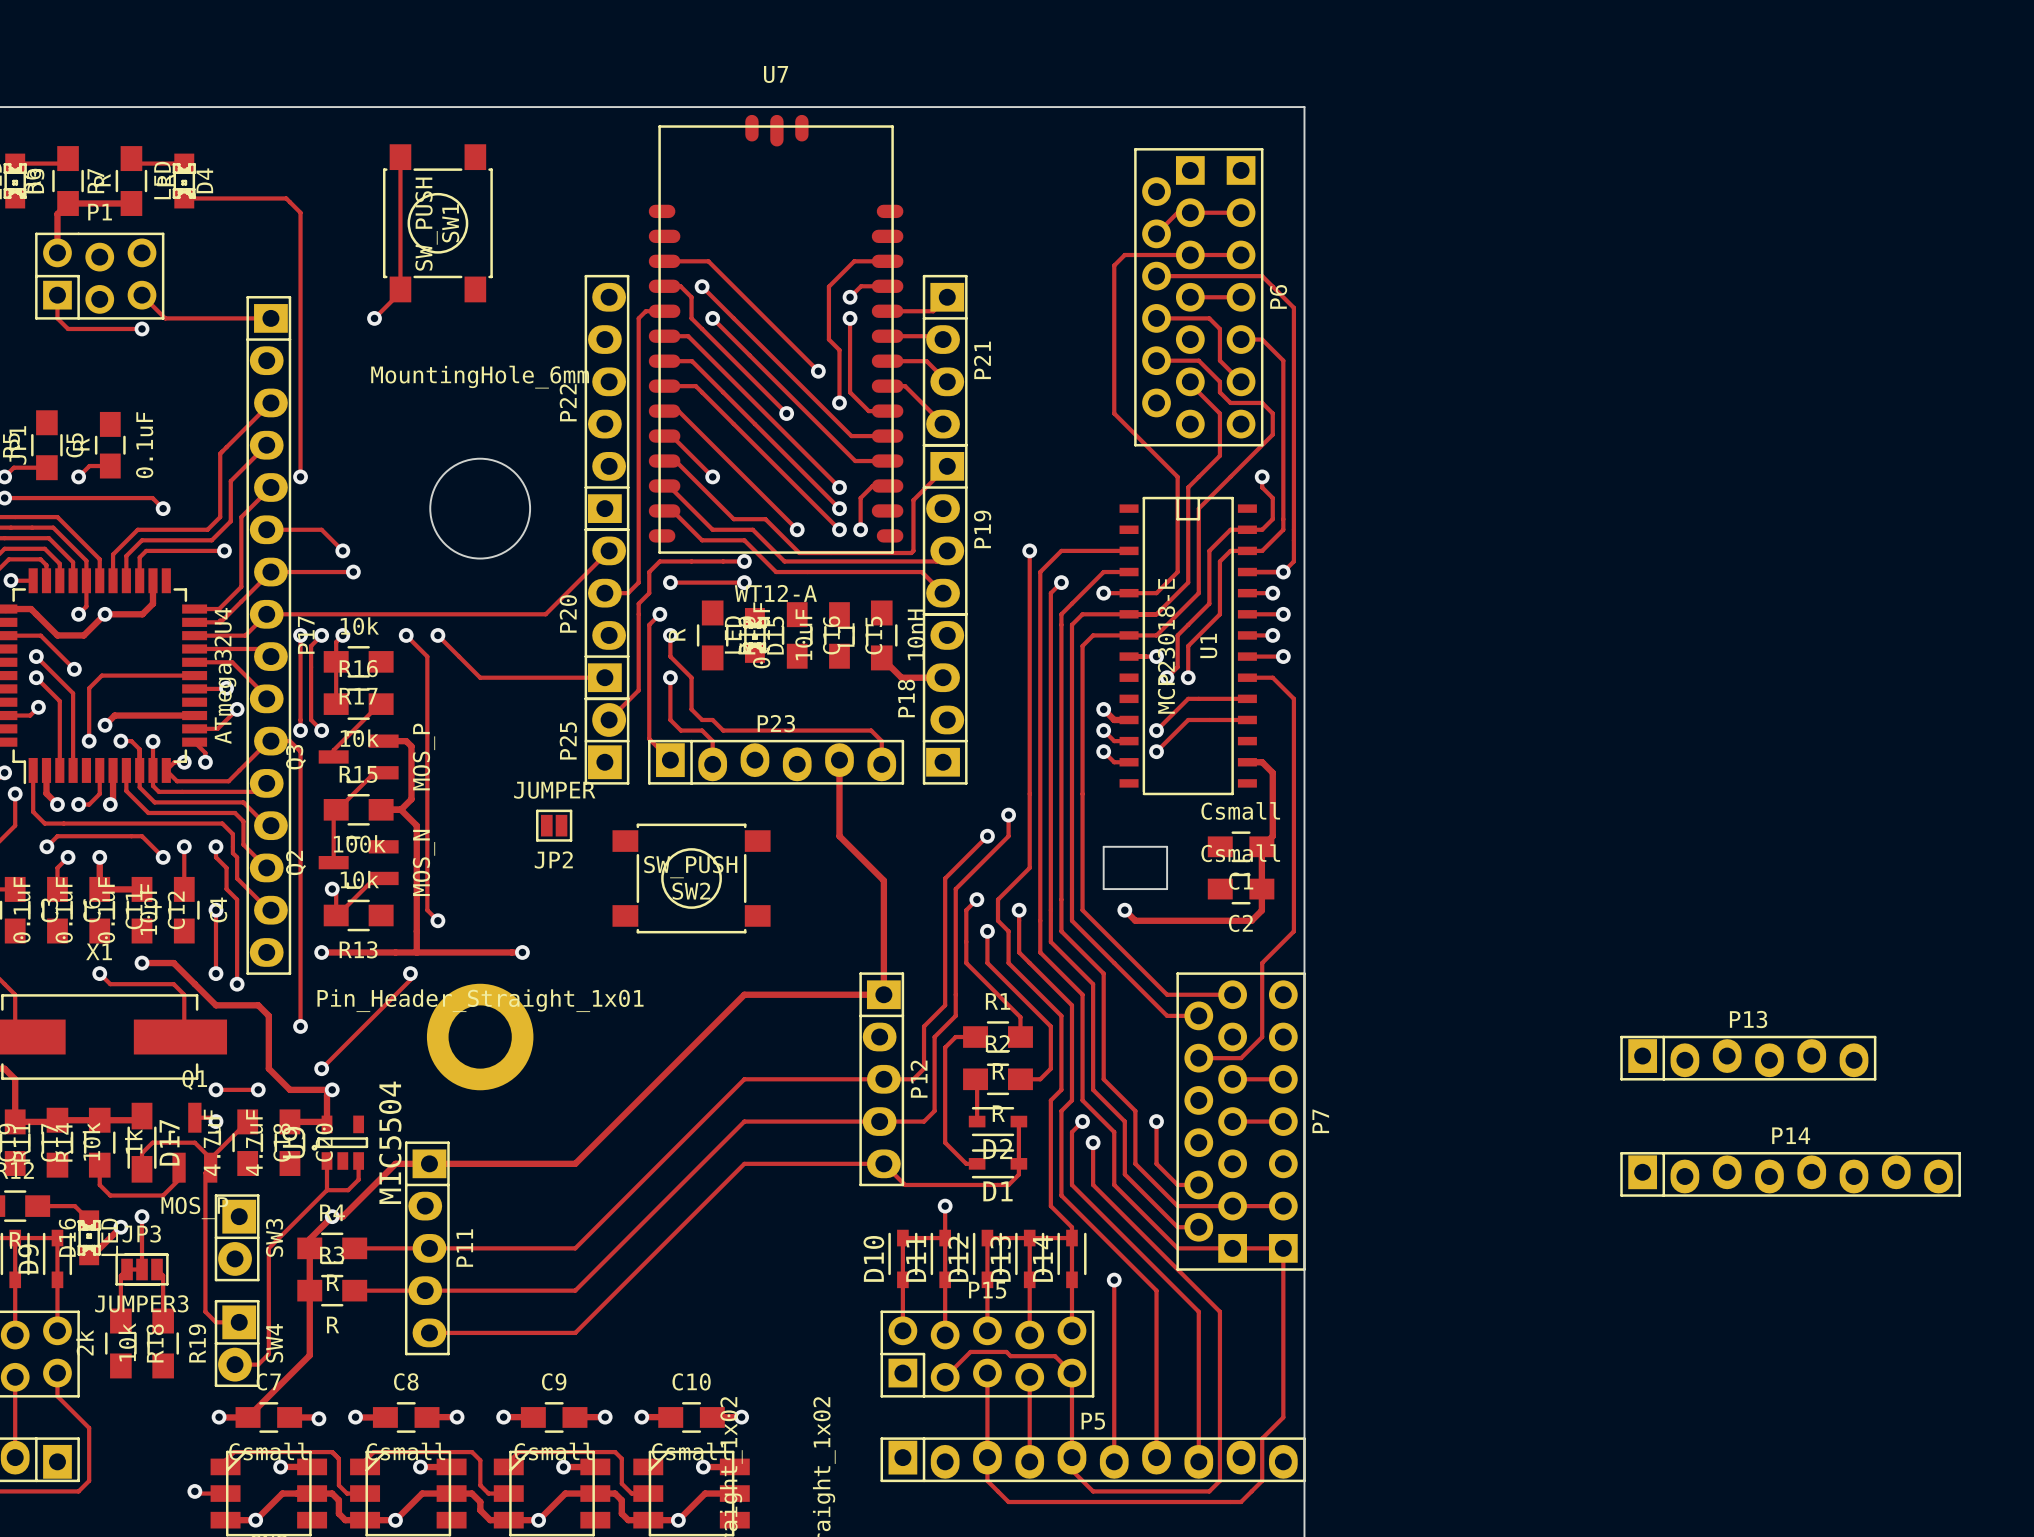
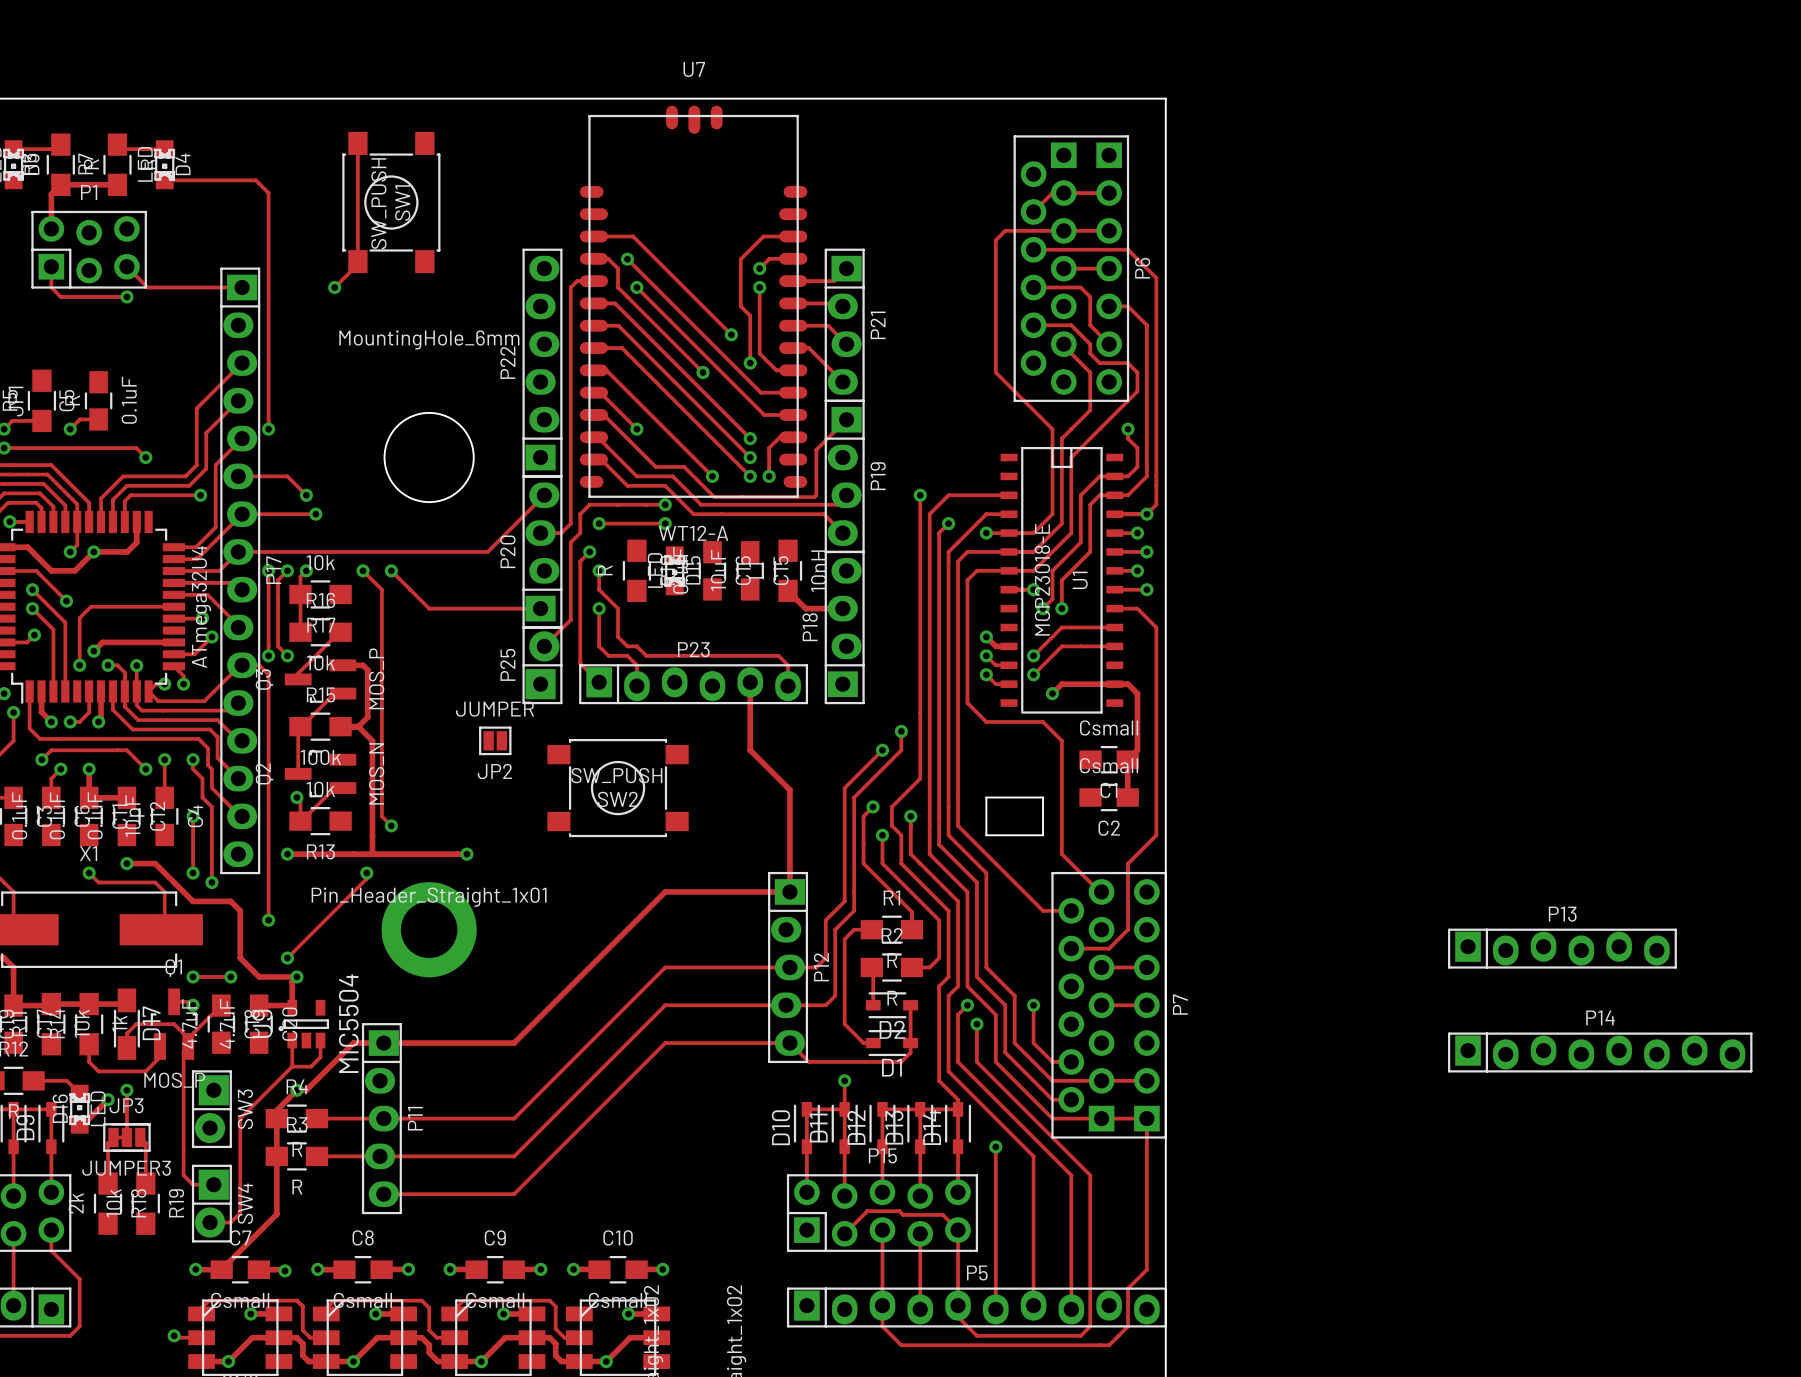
track: none -> (1114, 684) (1061, 684) (1052, 693)
via: none -> (1052, 693)
track: (1082, 783) (1082, 910) (1167, 994) (1230, 994) -> (967, 703) (986, 721) (1043, 721) (1061, 740) (1061, 854) (1099, 891)
board edge: (1103, 889) (1103, 846) (1167, 846) (1167, 889) -> (986, 797) (986, 835) (1043, 835) (1043, 797)
track: (1261, 889) (1261, 910) (1251, 920) (1135, 920) (1124, 910) -> none
via: (1124, 910) -> none

